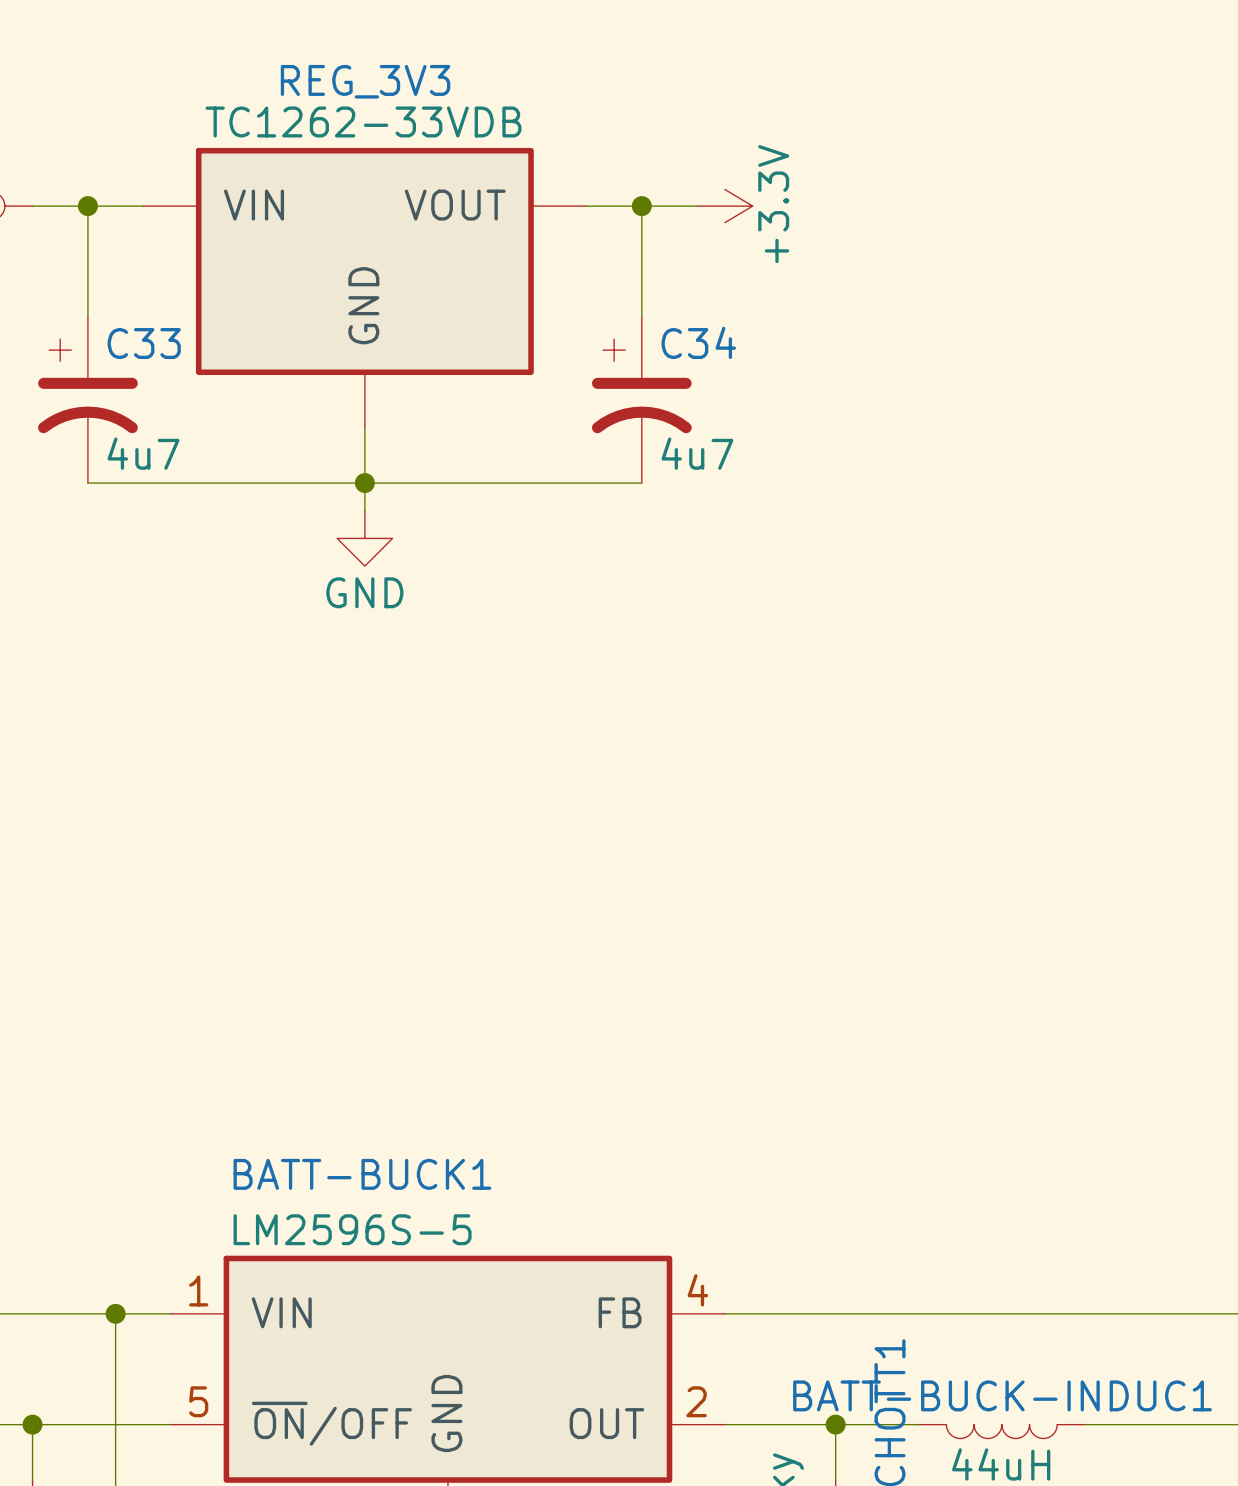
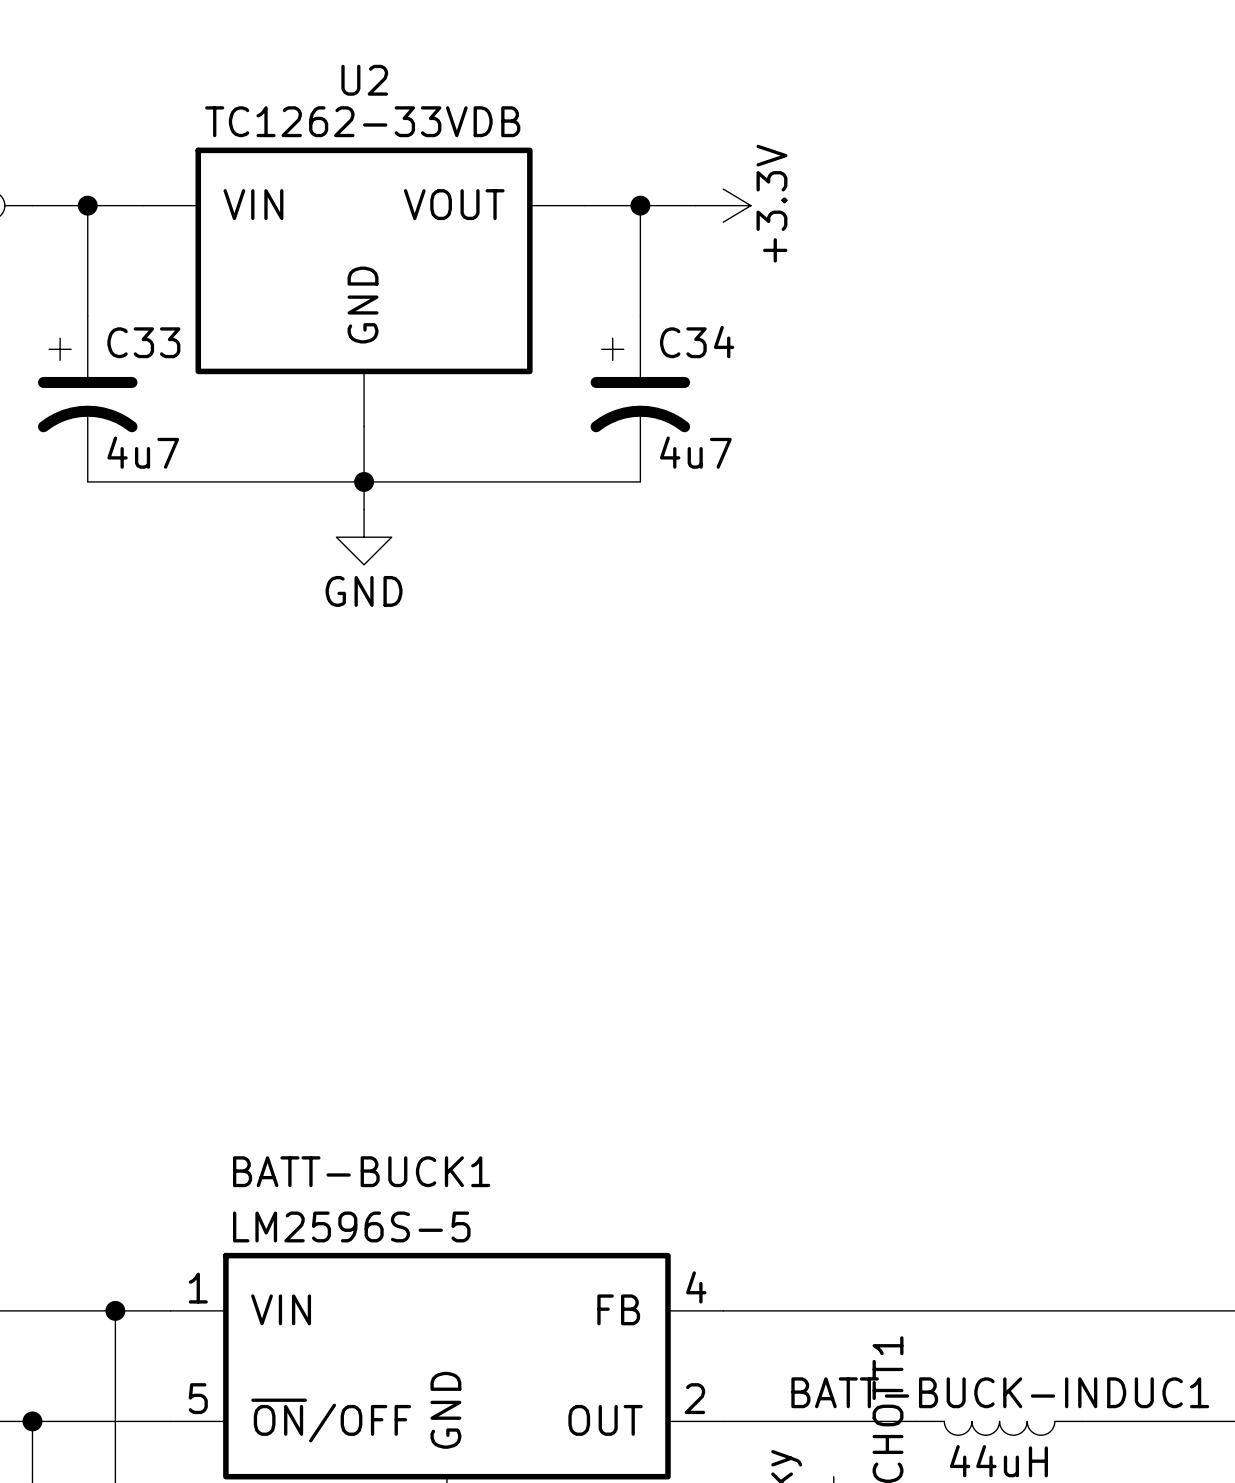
REG_3V3 name: REG_3V3 (365, 81) -> U2 (364, 80)
wire: (835, 1424) (835, 1480) -> none
junction: (835, 1424) -> none

